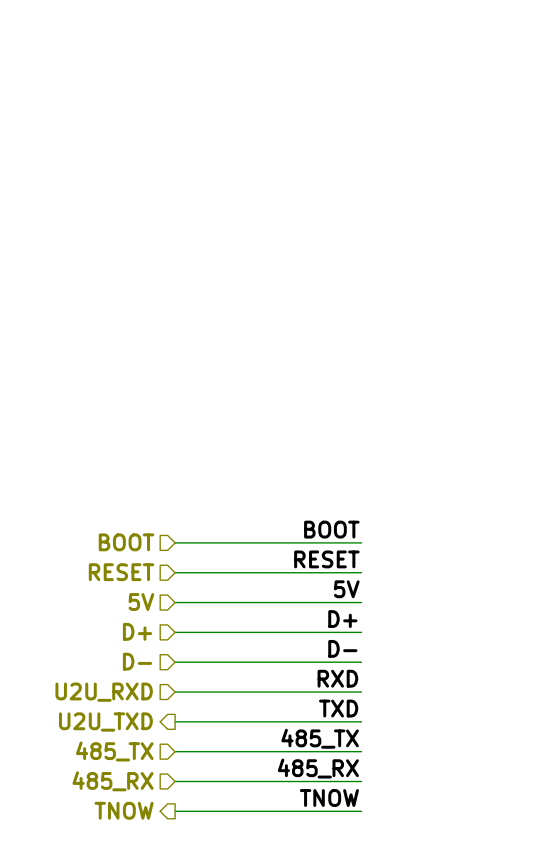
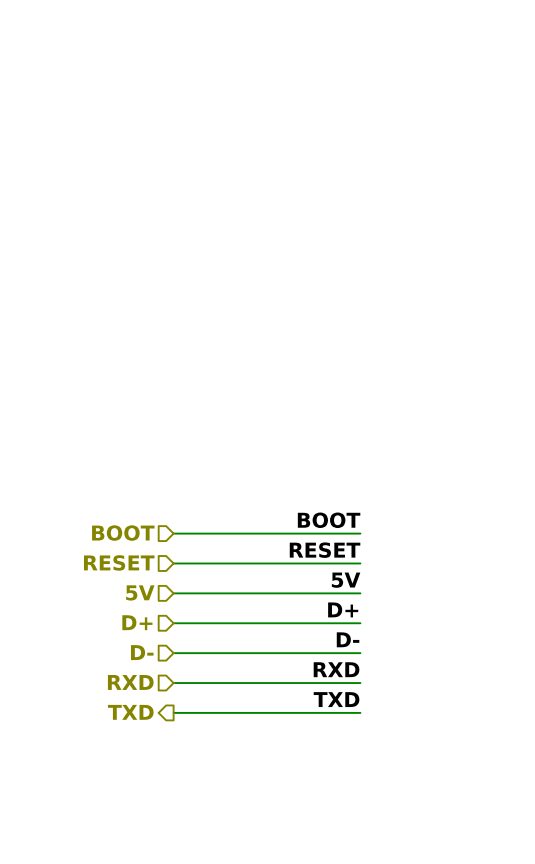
hierarchical label: U2U_RXD (104, 692) -> RXD (130, 682)
hierarchical label: U2U_TXD (105, 722) -> TXD (130, 712)
label: 485_TX (320, 738) -> none
hierarchical label: 485_TX (114, 751) -> none
wire: (175, 751) (361, 751) -> none
label: 485_RX (318, 768) -> none
hierarchical label: 485_RX (113, 781) -> none
wire: (175, 781) (361, 781) -> none
label: TNOW (329, 798) -> none
hierarchical label: TNOW (124, 810) -> none
wire: (175, 811) (361, 811) -> none

